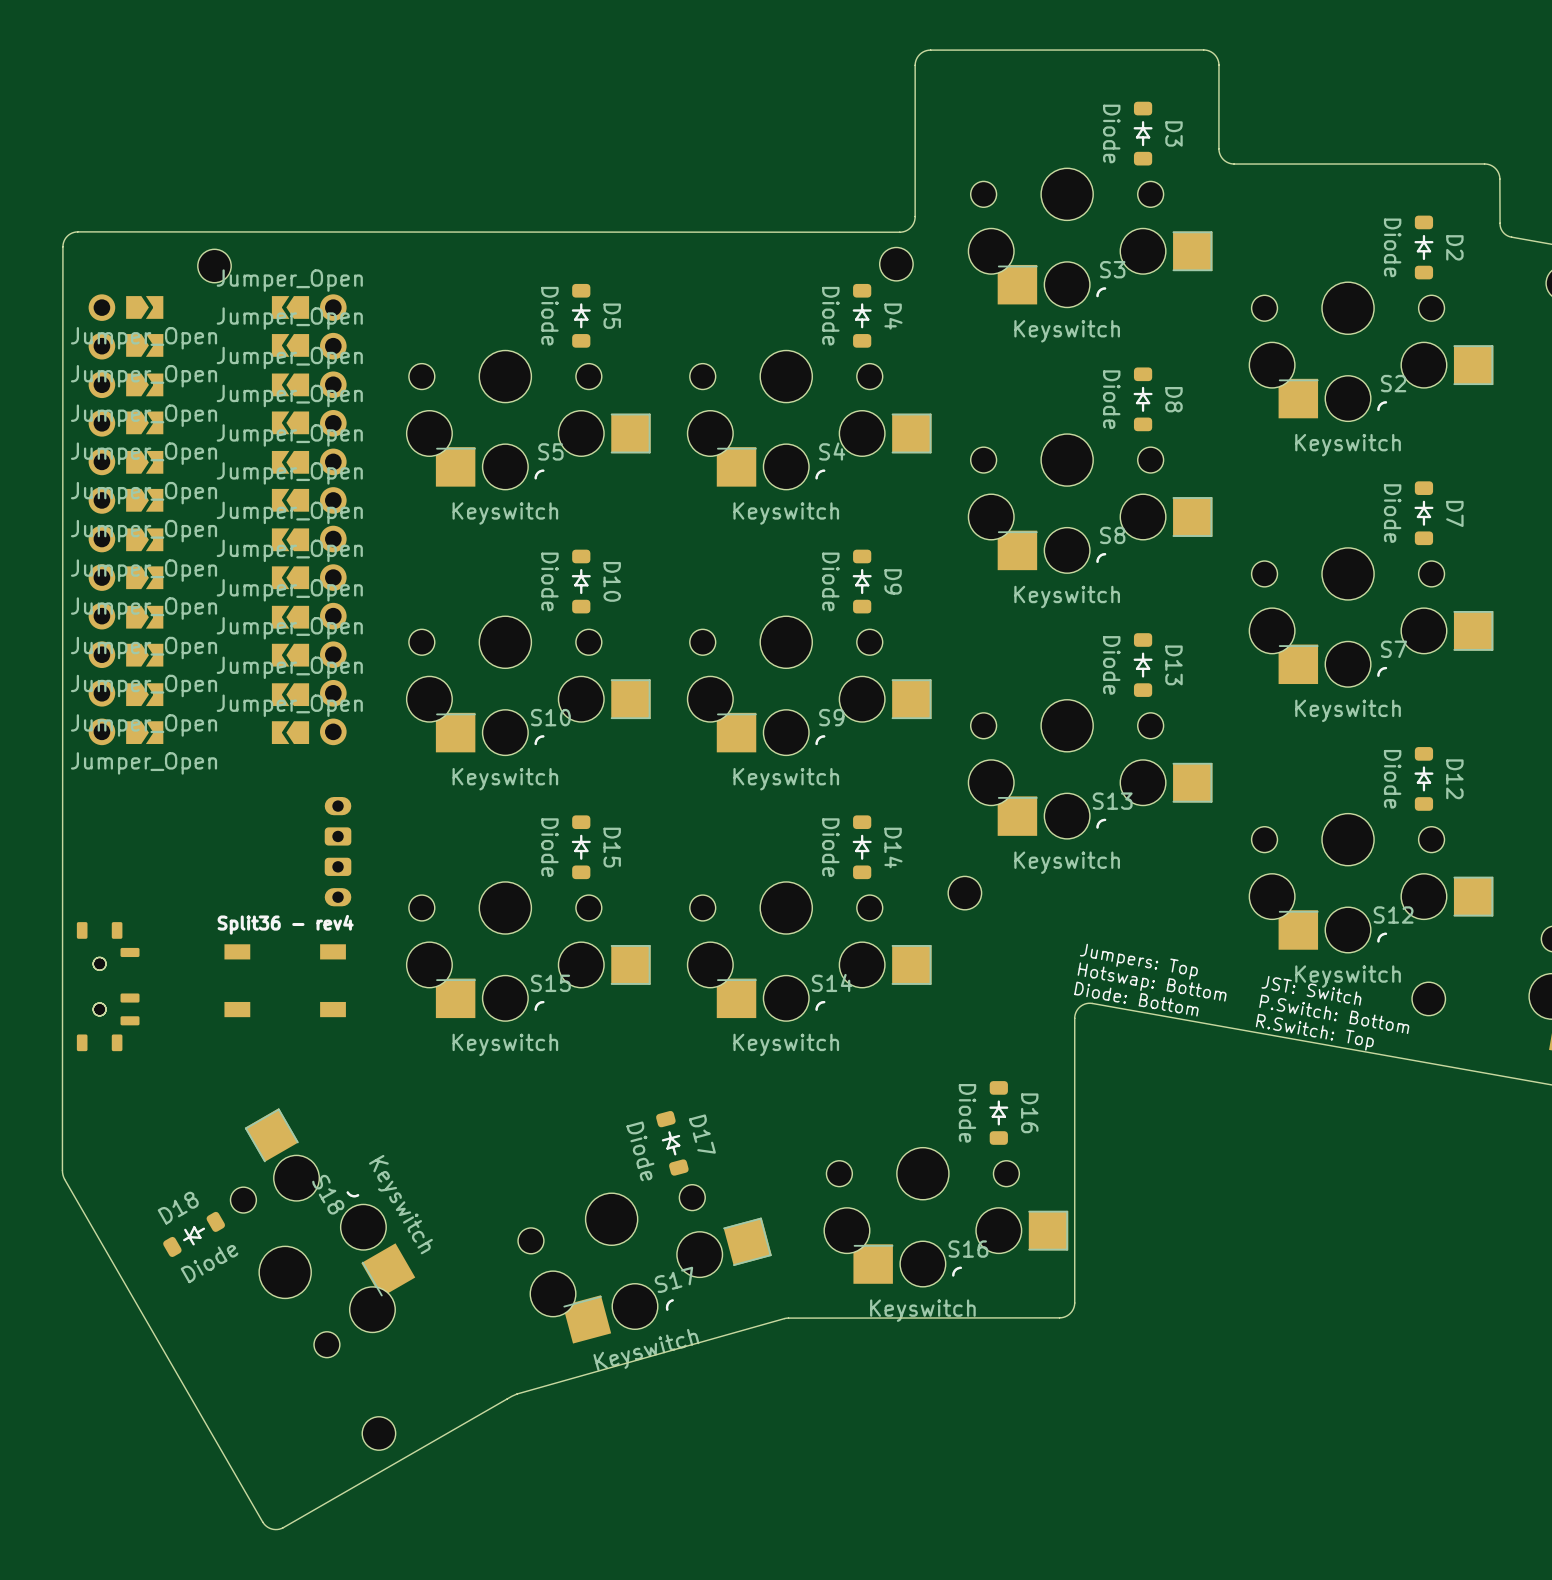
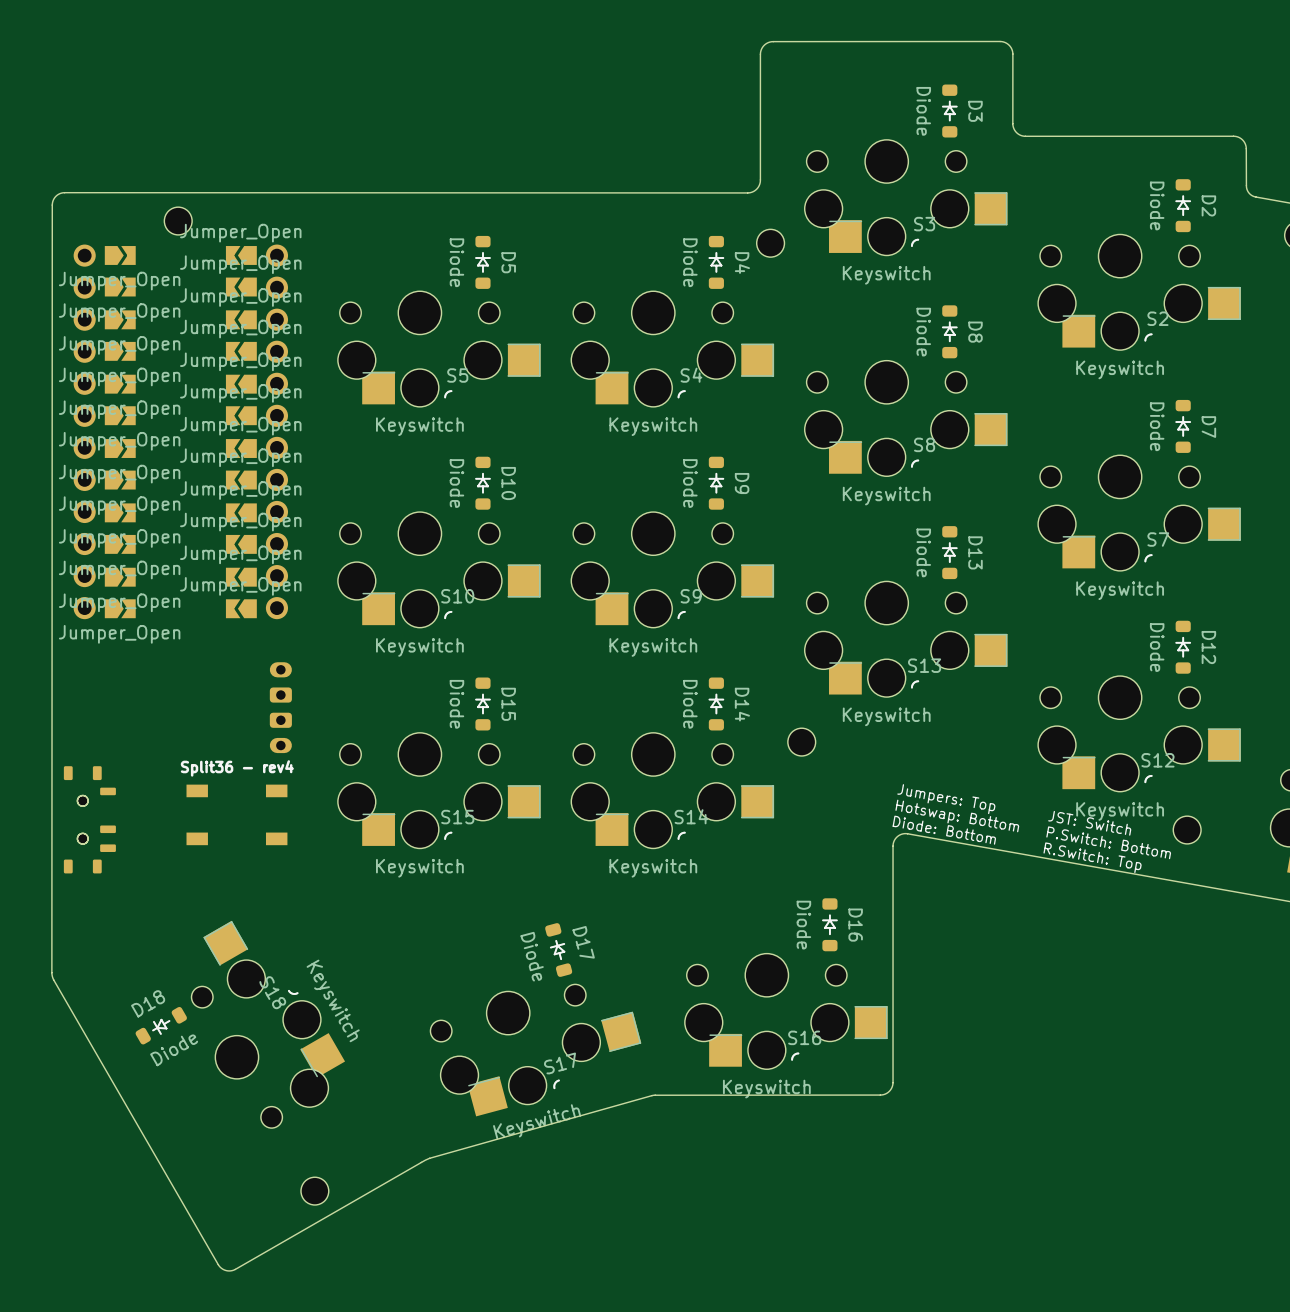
part position: (896, 264) -> (770, 243)

